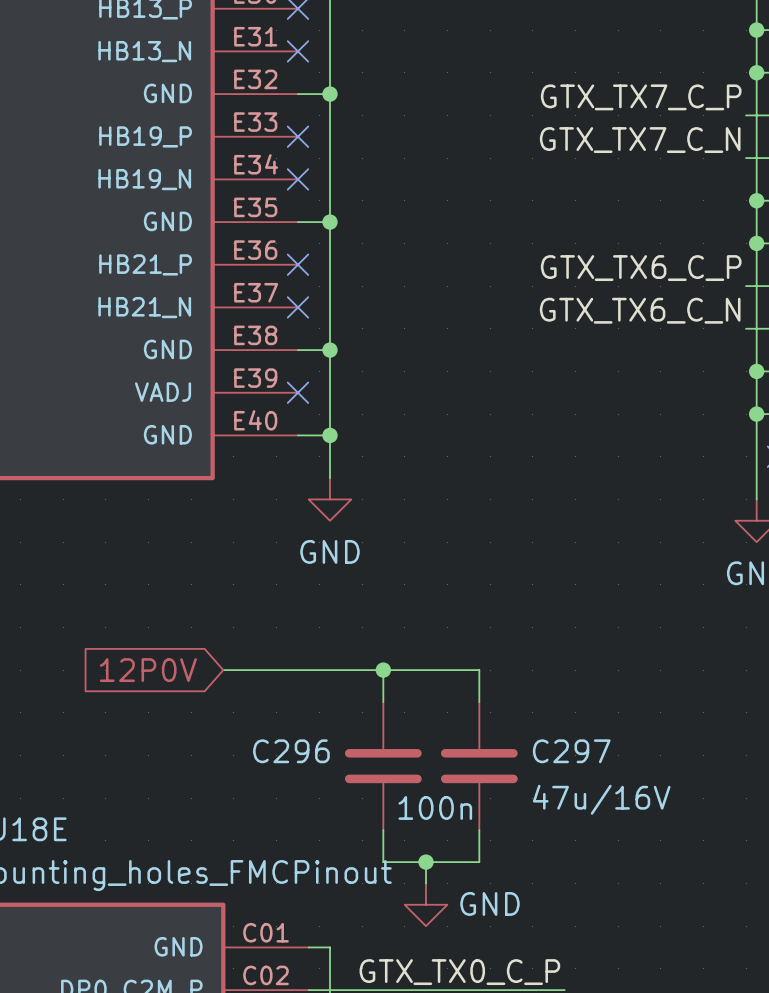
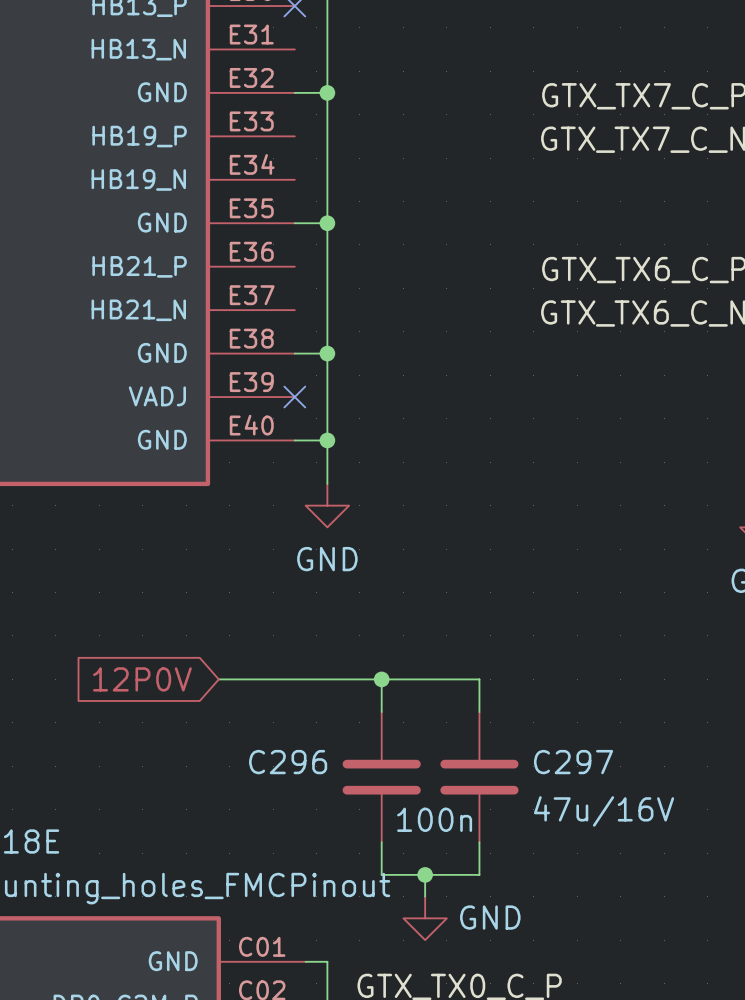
no-connect mark: (297, 51) -> none
no-connect mark: (297, 136) -> none
no-connect mark: (297, 179) -> none
no-connect mark: (297, 264) -> none
no-connect mark: (297, 307) -> none

